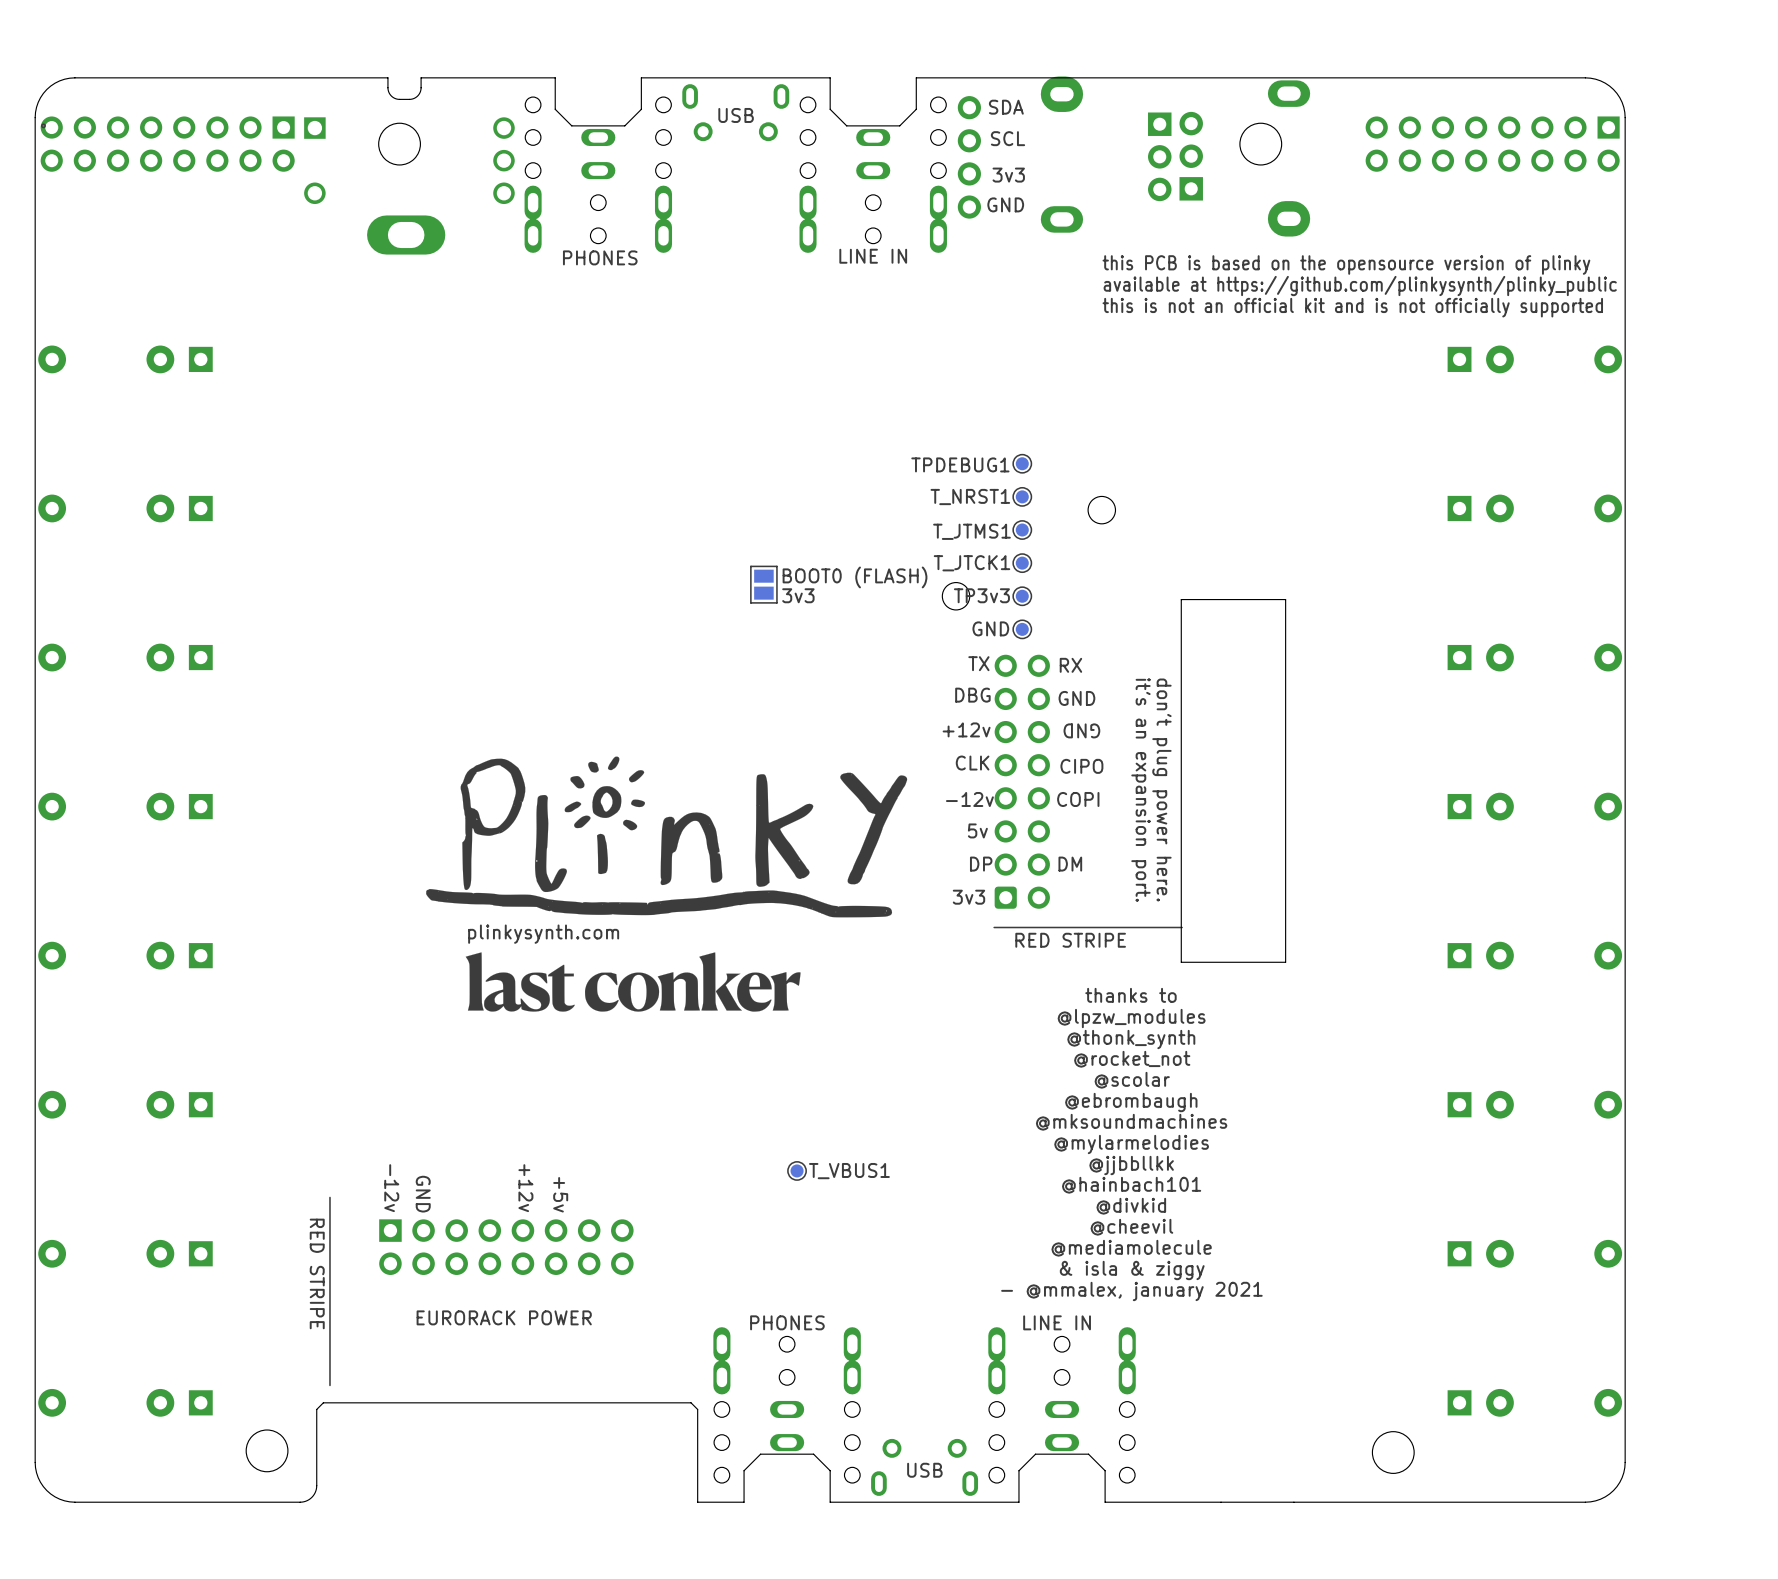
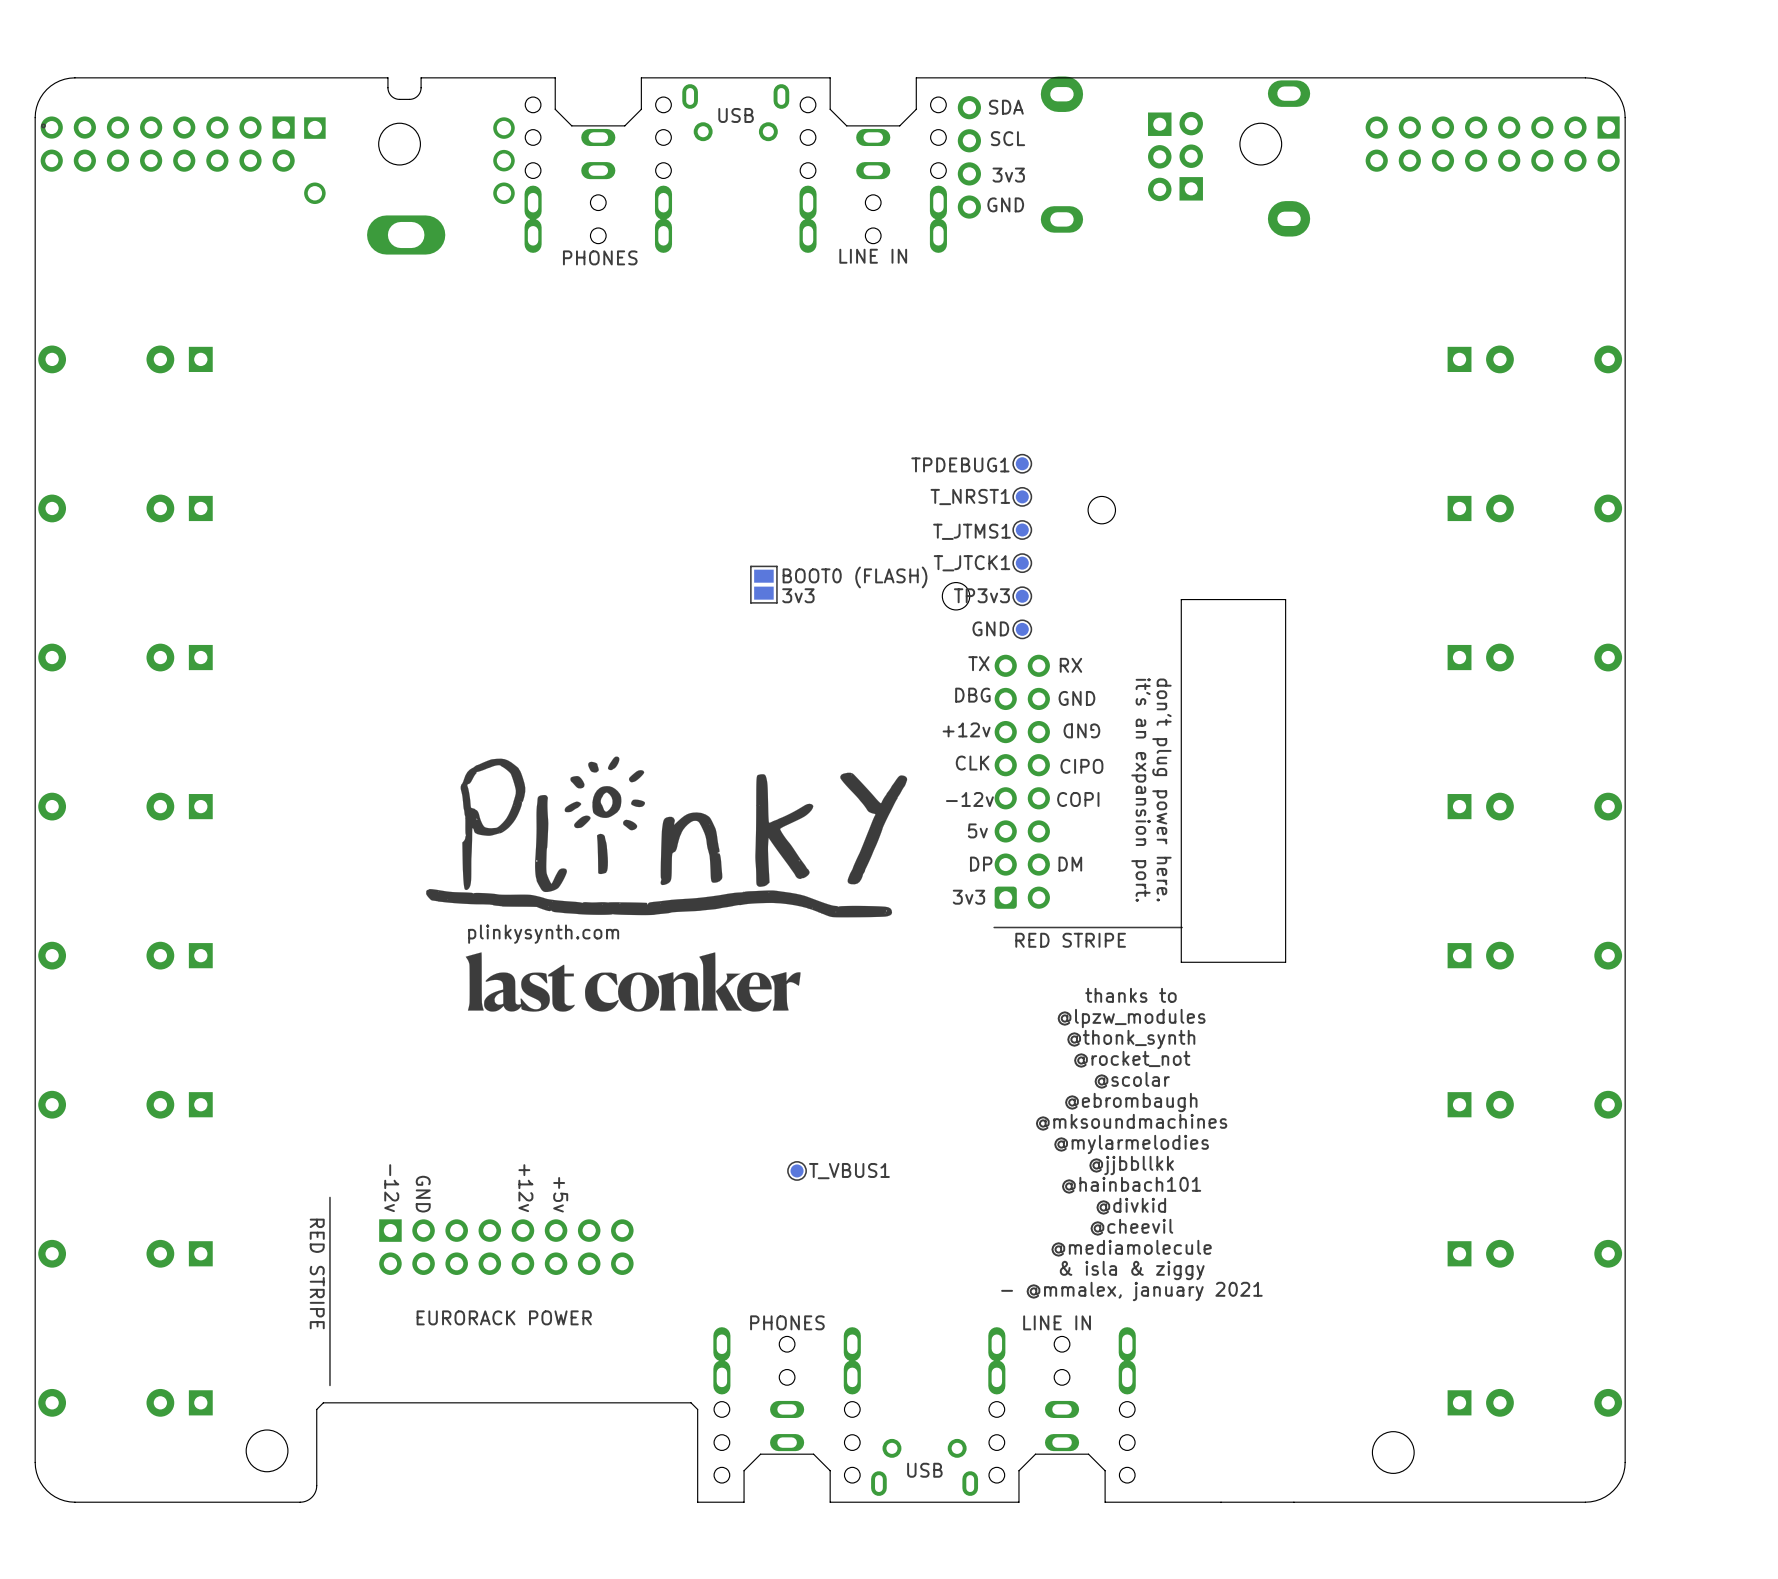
text: this PCB is based on the opensource version of plinky (1346, 265) -> none
text: available at https://github.com/plinkysynth/plinky_public (1360, 286) -> none
text: this is not an official kit and is not officially supported (1352, 307) -> none

